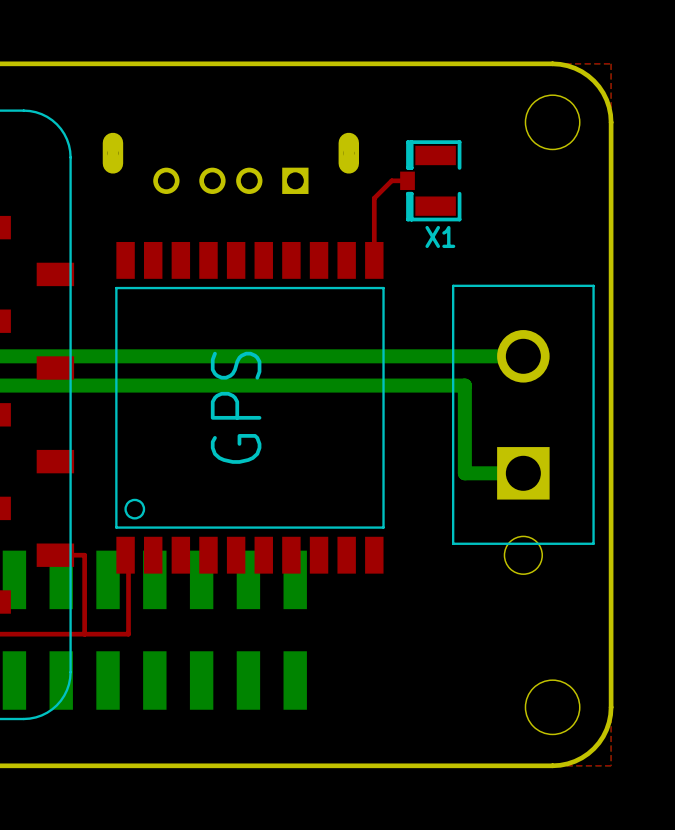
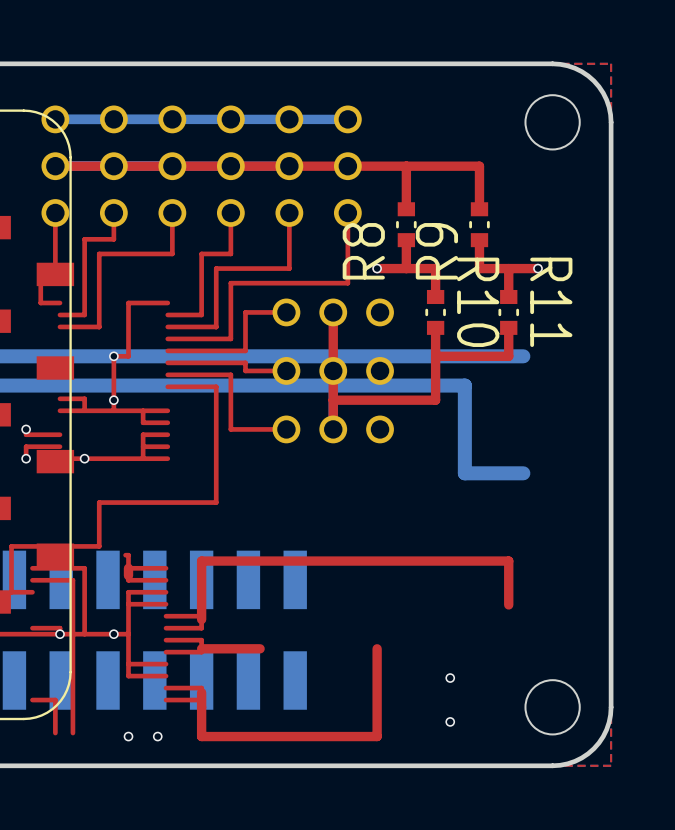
bottom track: none -> (55, 119) (347, 119)
part footprint: [102, 132, 359, 194] -> [216, 105, 245, 227]
top track: none -> (55, 166) (479, 166) (479, 209)
part: none -> (55, 166)
part: none -> (113, 166)
part: none -> (172, 166)
part: none -> (289, 166)
part: none -> (347, 166)
top track: none -> (406, 166) (406, 209)
top track: (407, 180) (391, 180) (374, 198) (374, 260) -> none
X1: (430, 180) -> none
top track: none -> (55, 212) (55, 283) (40, 283) (40, 303) (59, 303)
top track: none -> (113, 212) (113, 239) (84, 239) (84, 314) (59, 314)
top track: none -> (172, 212) (172, 253) (99, 253) (99, 327)
top track: none -> (230, 212) (230, 253) (201, 253) (201, 314) (167, 314)
top track: none -> (289, 212) (289, 268) (216, 268) (216, 327)
top track: none -> (347, 212) (347, 283) (230, 283) (230, 338) (167, 338)
R8: none -> (406, 224)
R9: none -> (479, 224)
top track: none -> (406, 240) (406, 268)
top track: none -> (479, 240) (479, 268) (537, 268)
top track: none -> (377, 268) (435, 268) (435, 297)
via: none -> (377, 268)
top track: none -> (508, 268) (508, 297)
via: none -> (537, 268)
top track: none -> (167, 303) (128, 303) (128, 356) (113, 356) (113, 410)
top track: none -> (286, 312) (245, 312) (245, 350) (167, 350)
top track: none -> (333, 312) (333, 429)
part: none -> (333, 312)
R10: none -> (435, 312)
R11: none -> (508, 312)
top track: none -> (59, 326) (99, 326)
top track: none -> (167, 326) (216, 326)
top track: none -> (435, 327) (435, 400) (333, 400)
top track: none -> (508, 327) (508, 356) (435, 356)
via: none -> (113, 356)
top track: none -> (167, 362) (245, 362) (245, 370) (286, 370)
part: none -> (333, 370)
top track: none -> (167, 374) (230, 374) (230, 429) (286, 429)
top track: none -> (167, 386) (216, 386) (216, 502) (99, 502) (99, 546) (11, 546) (11, 592) (32, 592)
top track: none -> (59, 398) (84, 398) (84, 410)
via: none -> (113, 400)
part: (249, 407) -> none
top track: none -> (59, 410) (167, 410)
top track: none -> (143, 410) (143, 422) (167, 422)
top track: none -> (26, 429) (26, 434) (59, 434)
via: none -> (26, 429)
part: none -> (333, 429)
part: (523, 429) -> none
top track: none -> (167, 434) (143, 434) (143, 458)
top track: none -> (59, 446) (26, 446) (26, 458)
top track: none -> (143, 446) (167, 446)
via: none -> (26, 458)
top track: none -> (59, 458) (167, 458)
via: none -> (84, 458)
top track: (55, 555) (84, 555) (84, 568) -> (32, 568) (84, 568)
top track: none -> (166, 568) (128, 568) (128, 575)
top track: none -> (32, 580) (72, 580) (72, 733)
top track: (128, 580) (128, 592) -> (128, 580) (166, 580)
top track: none -> (128, 592) (166, 592)
top track: none -> (128, 604) (166, 604)
top track: none -> (508, 604) (508, 561) (201, 561) (201, 619)
top track: none -> (166, 616) (201, 616) (201, 628) (166, 628)
top track: none -> (32, 628) (60, 628) (60, 634)
via: none -> (60, 634)
via: none -> (113, 634)
top track: none -> (128, 634) (128, 676) (166, 676)
top track: none -> (166, 640) (201, 640) (201, 652) (166, 652)
top track: none -> (201, 648) (260, 648)
top track: none -> (377, 648) (377, 736) (201, 736) (201, 688) (166, 688)
top track: none -> (128, 664) (166, 664)
via: none -> (450, 678)
top track: none -> (32, 700) (55, 700) (55, 733)
top track: none -> (166, 700) (201, 700) (201, 707)
via: none -> (450, 721)
via: none -> (128, 736)
via: none -> (157, 736)

